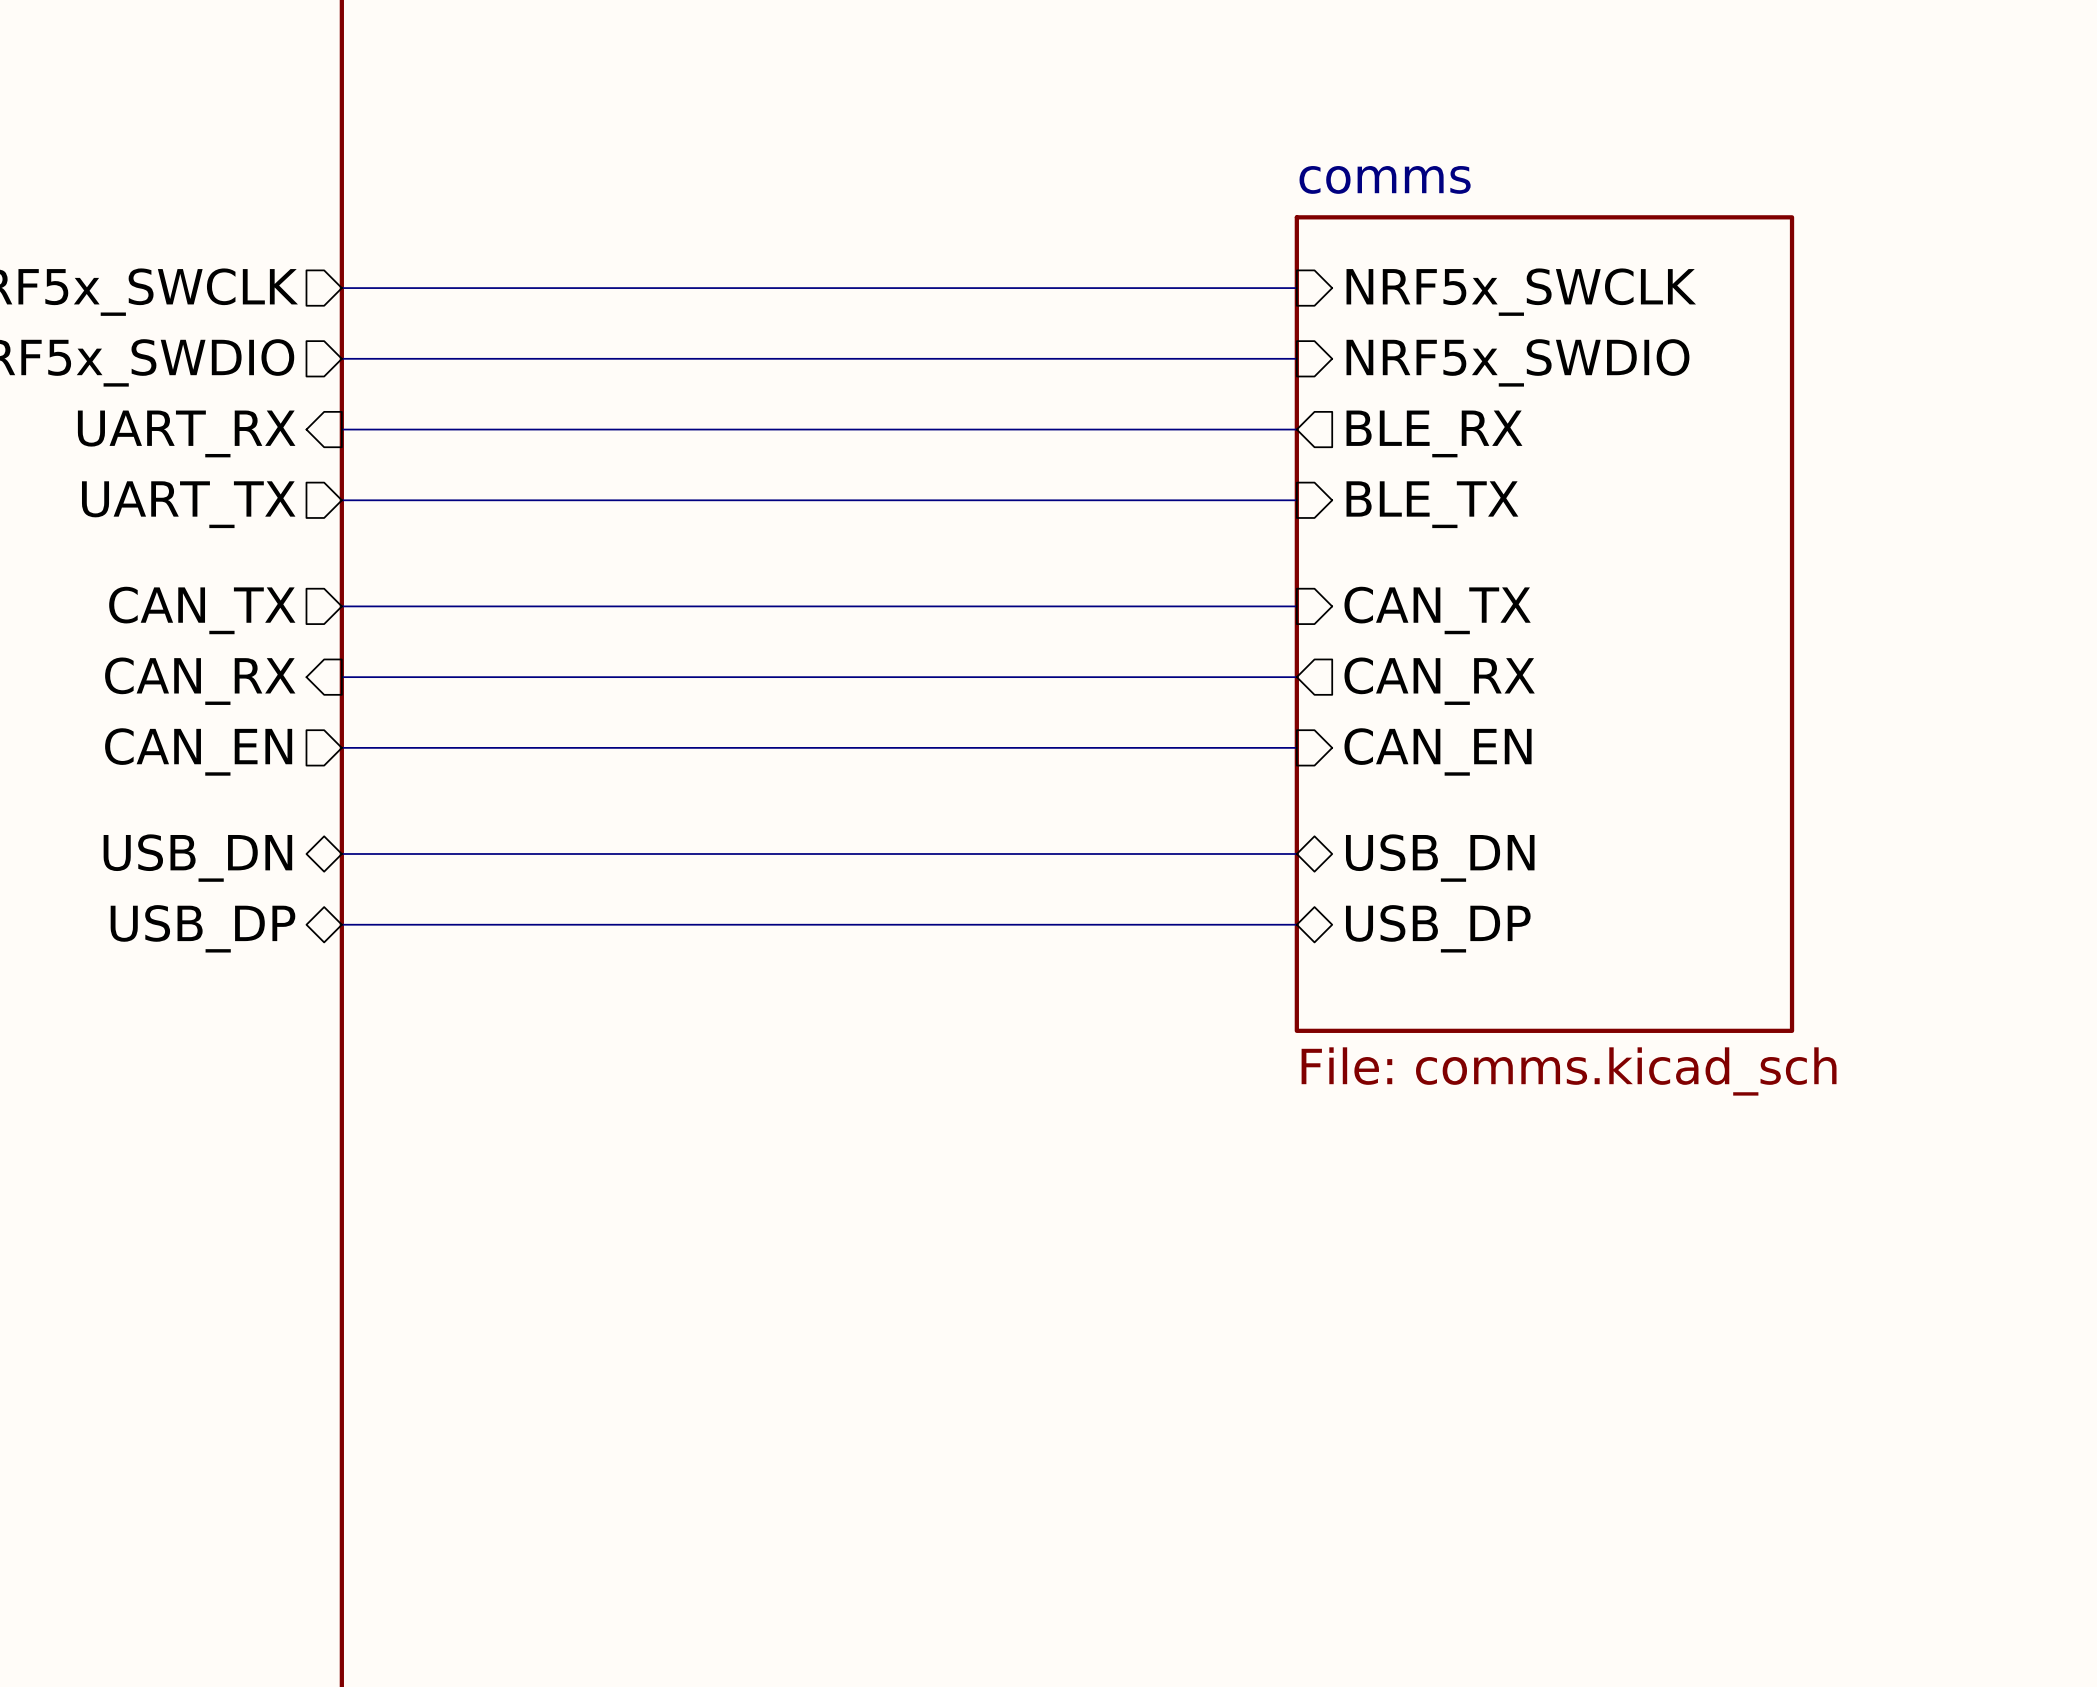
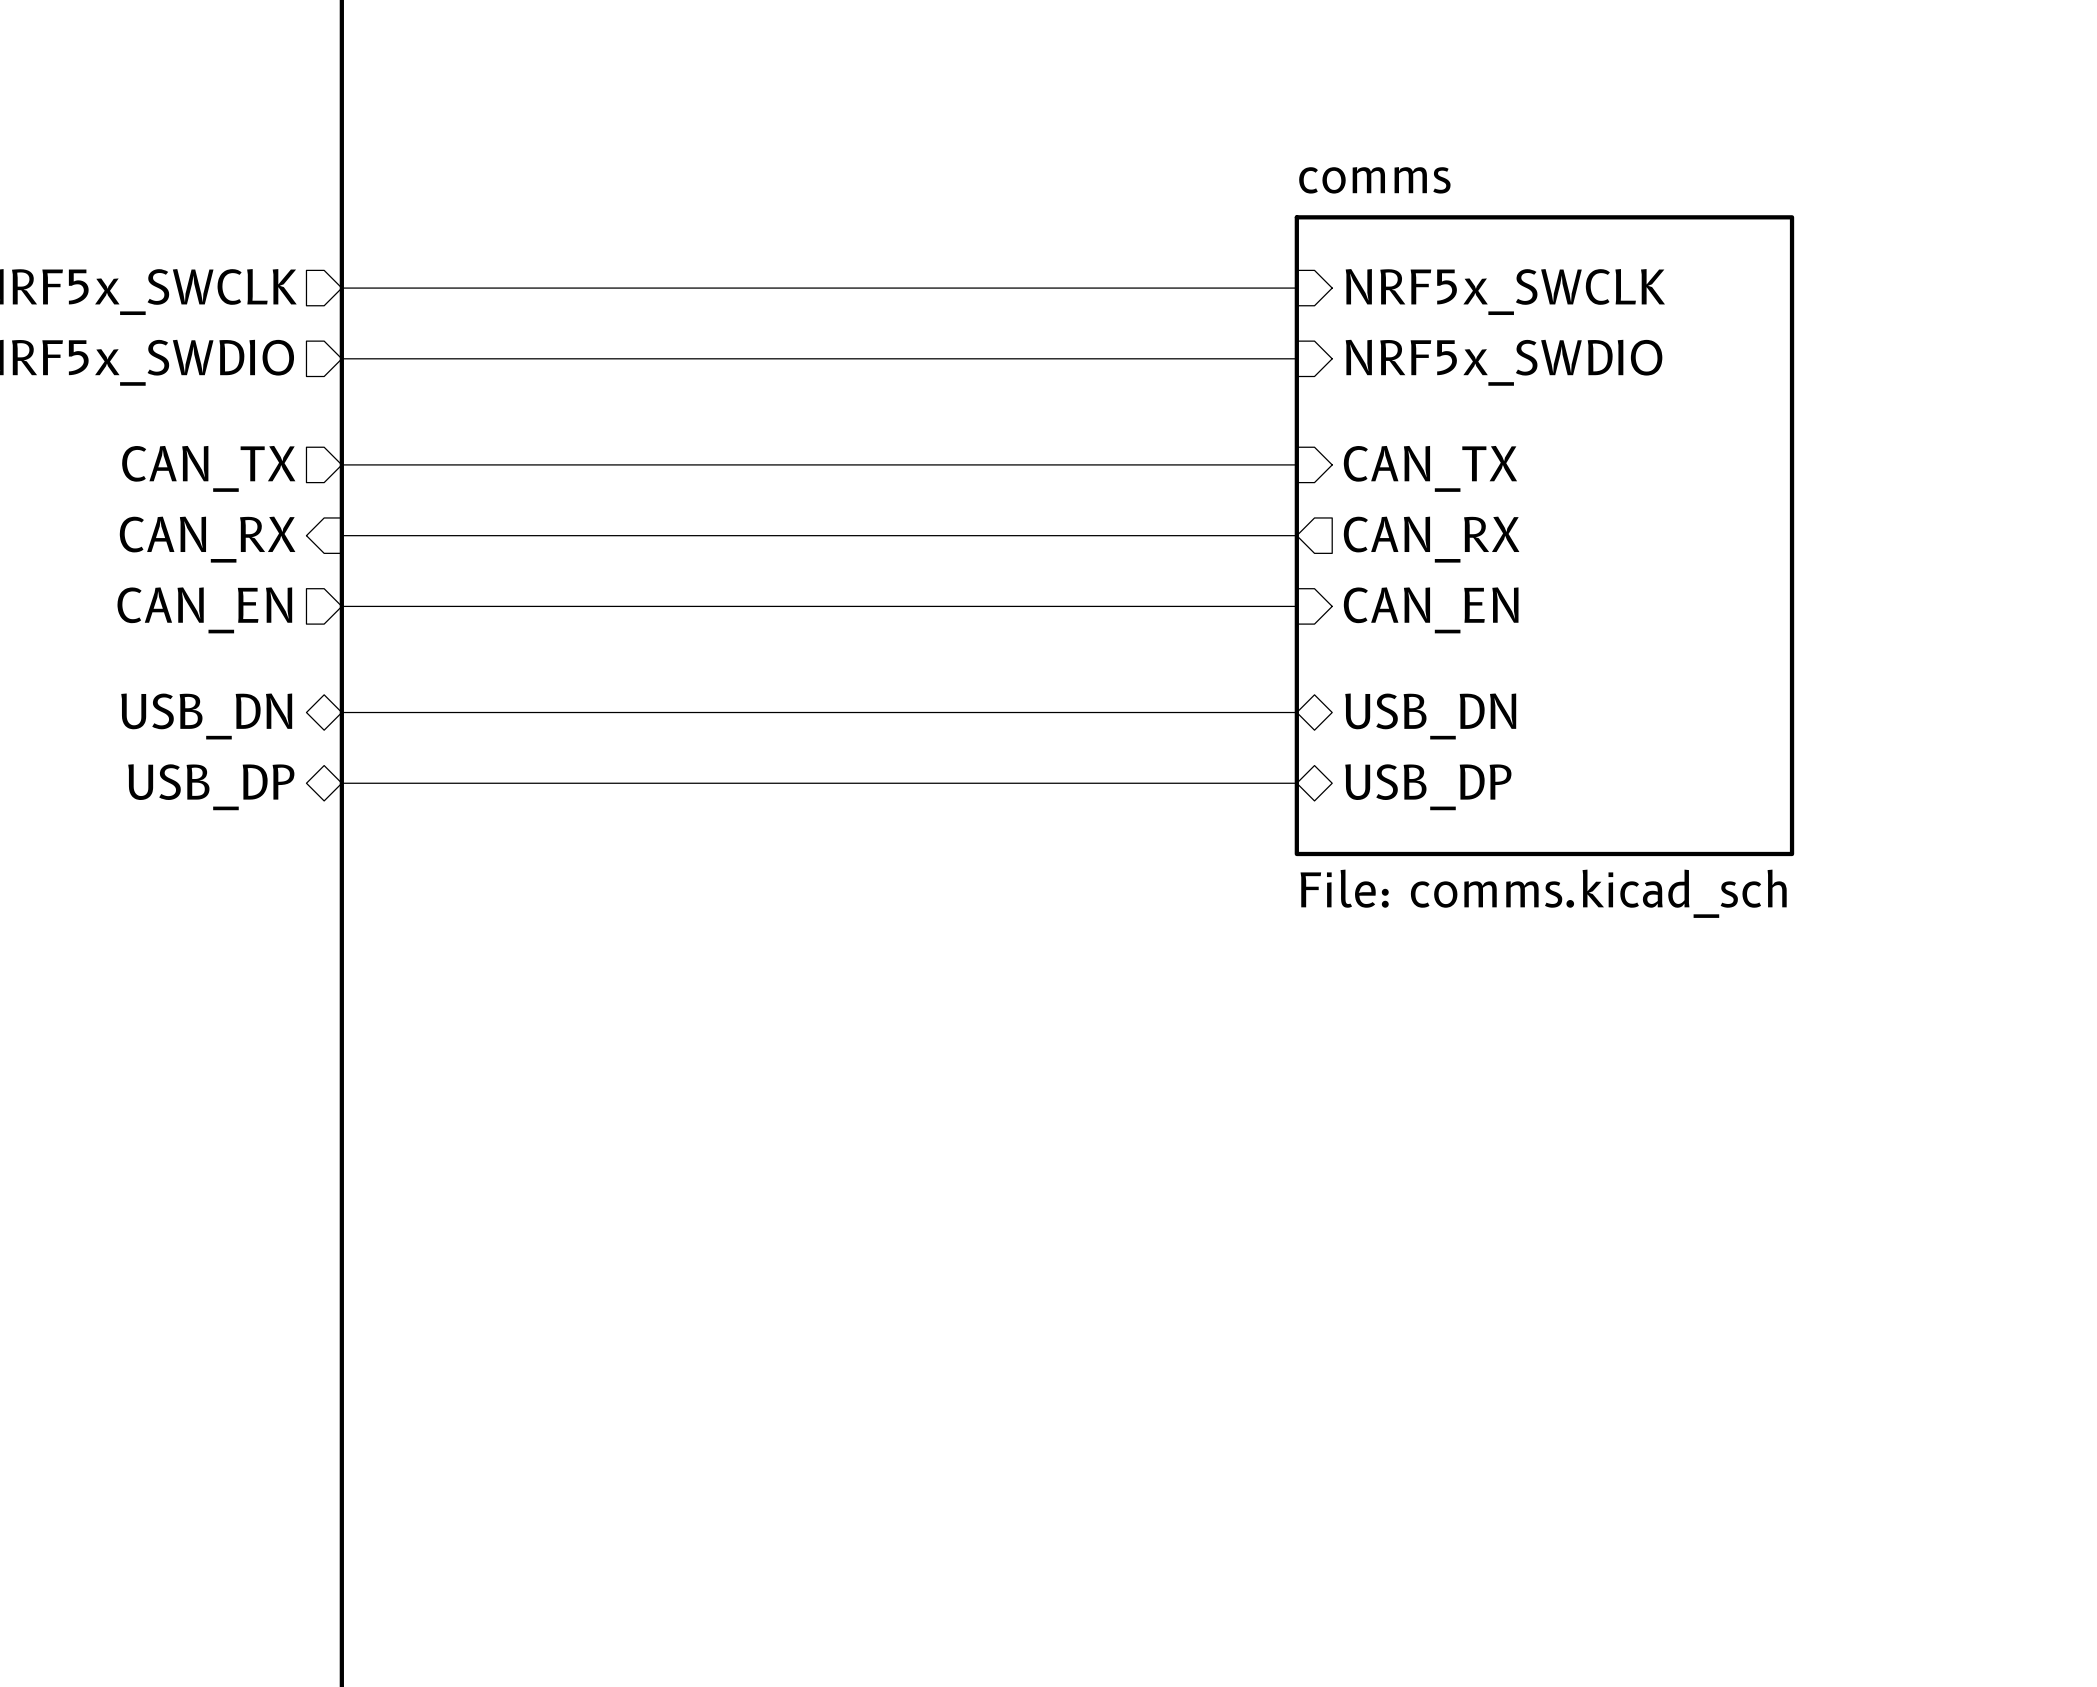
wire: (341, 429) (1296, 429) -> (341, 464) (1296, 464)
sheet pin: UART_RX (186, 433) -> none
sheet pin: BLE_RX (1434, 433) -> none
sheet pin: none -> CAN_TX (1430, 468)
wire: (341, 500) (1296, 500) -> (341, 535) (1296, 535)
sheet pin: UART_TX (188, 504) -> CAN_TX (208, 468)
sheet pin: BLE_TX (1432, 504) -> none
sheet comms: none -> File: comms.kicad_sch (1544, 535)
sheet pin: CAN_TX (202, 610) -> CAN_EN (204, 610)
sheet pin: CAN_TX (1437, 610) -> CAN_EN (1431, 610)
sheet comms: File: comms.kicad_sch (1544, 624) -> none
wire: (341, 677) (1296, 677) -> (341, 712) (1296, 712)
sheet pin position: CAN_RX (200, 681) -> CAN_RX (207, 539)
sheet pin position: CAN_RX (1439, 681) -> CAN_RX (1431, 539)
wire: (341, 747) (1296, 747) -> (341, 783) (1296, 783)
sheet pin: CAN_EN (198, 751) -> none
sheet pin: CAN_EN (1438, 751) -> none
wire: (341, 853) (1296, 853) -> none
sheet pin position: USB_DN (197, 858) -> USB_DN (206, 716)
sheet pin position: USB_DN (1440, 858) -> USB_DN (1430, 716)
wire: (341, 924) (1296, 924) -> none
sheet pin position: USB_DP (202, 928) -> USB_DP (211, 787)
sheet pin position: USB_DP (1438, 928) -> USB_DP (1428, 787)

